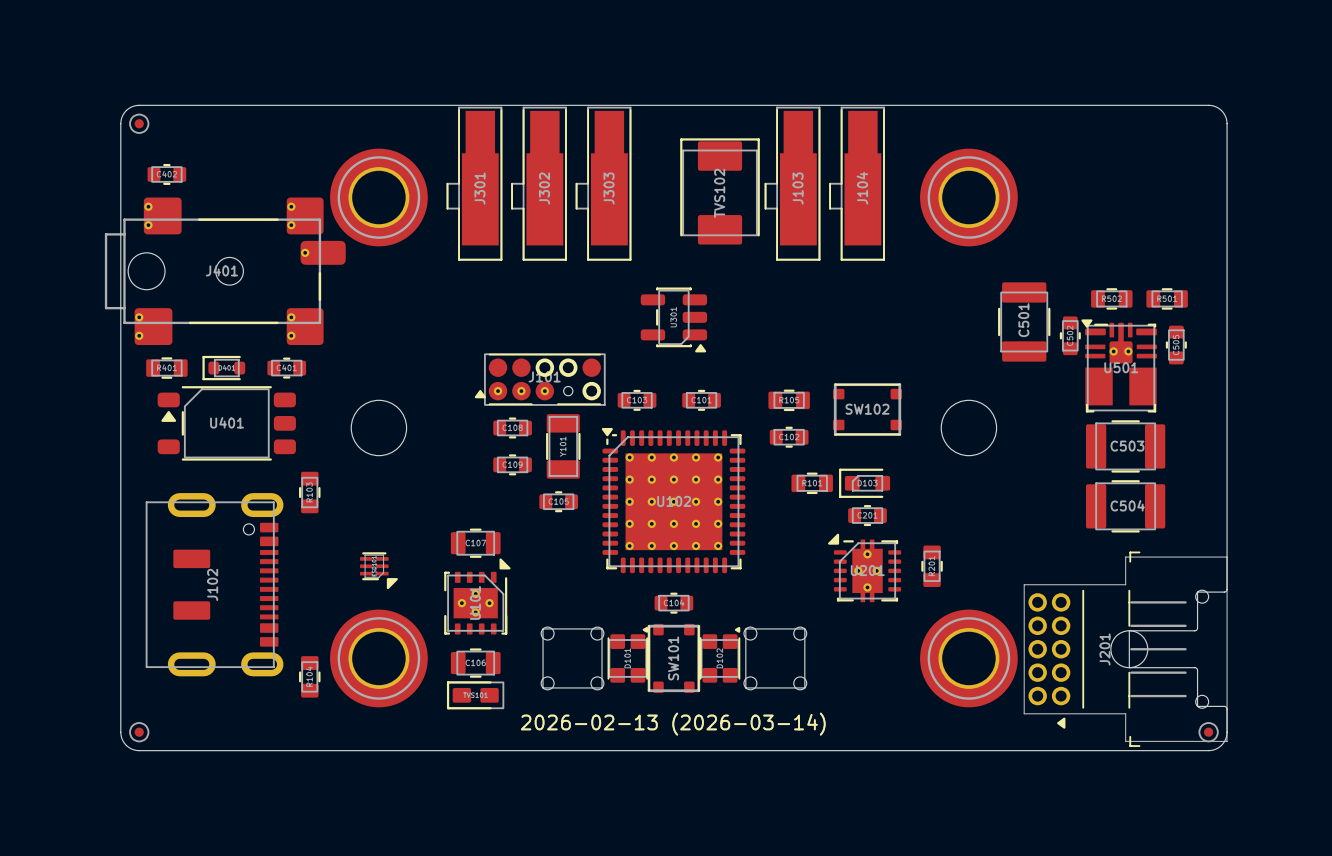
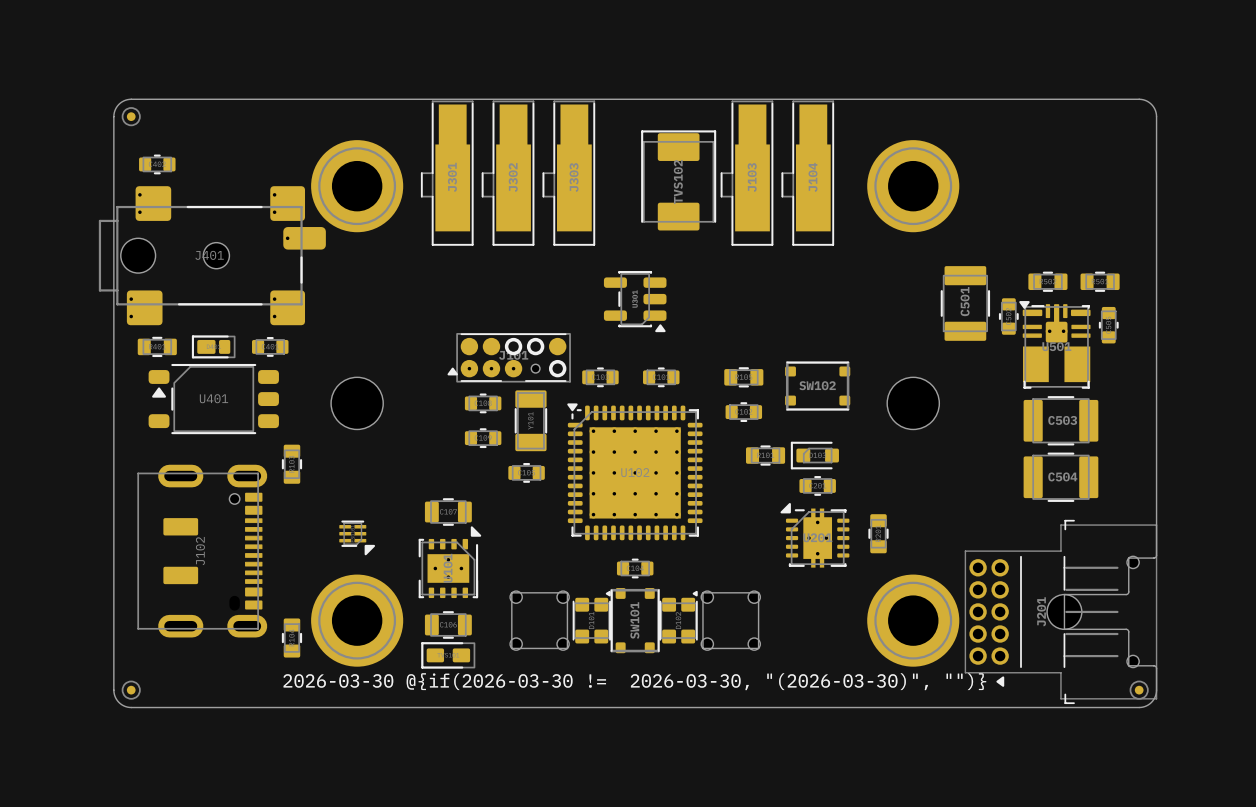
part footprint: [202, 355, 246, 381] -> [191, 335, 236, 359]
drawing shape: [520, 712, 826, 736] -> [283, 673, 987, 691]

